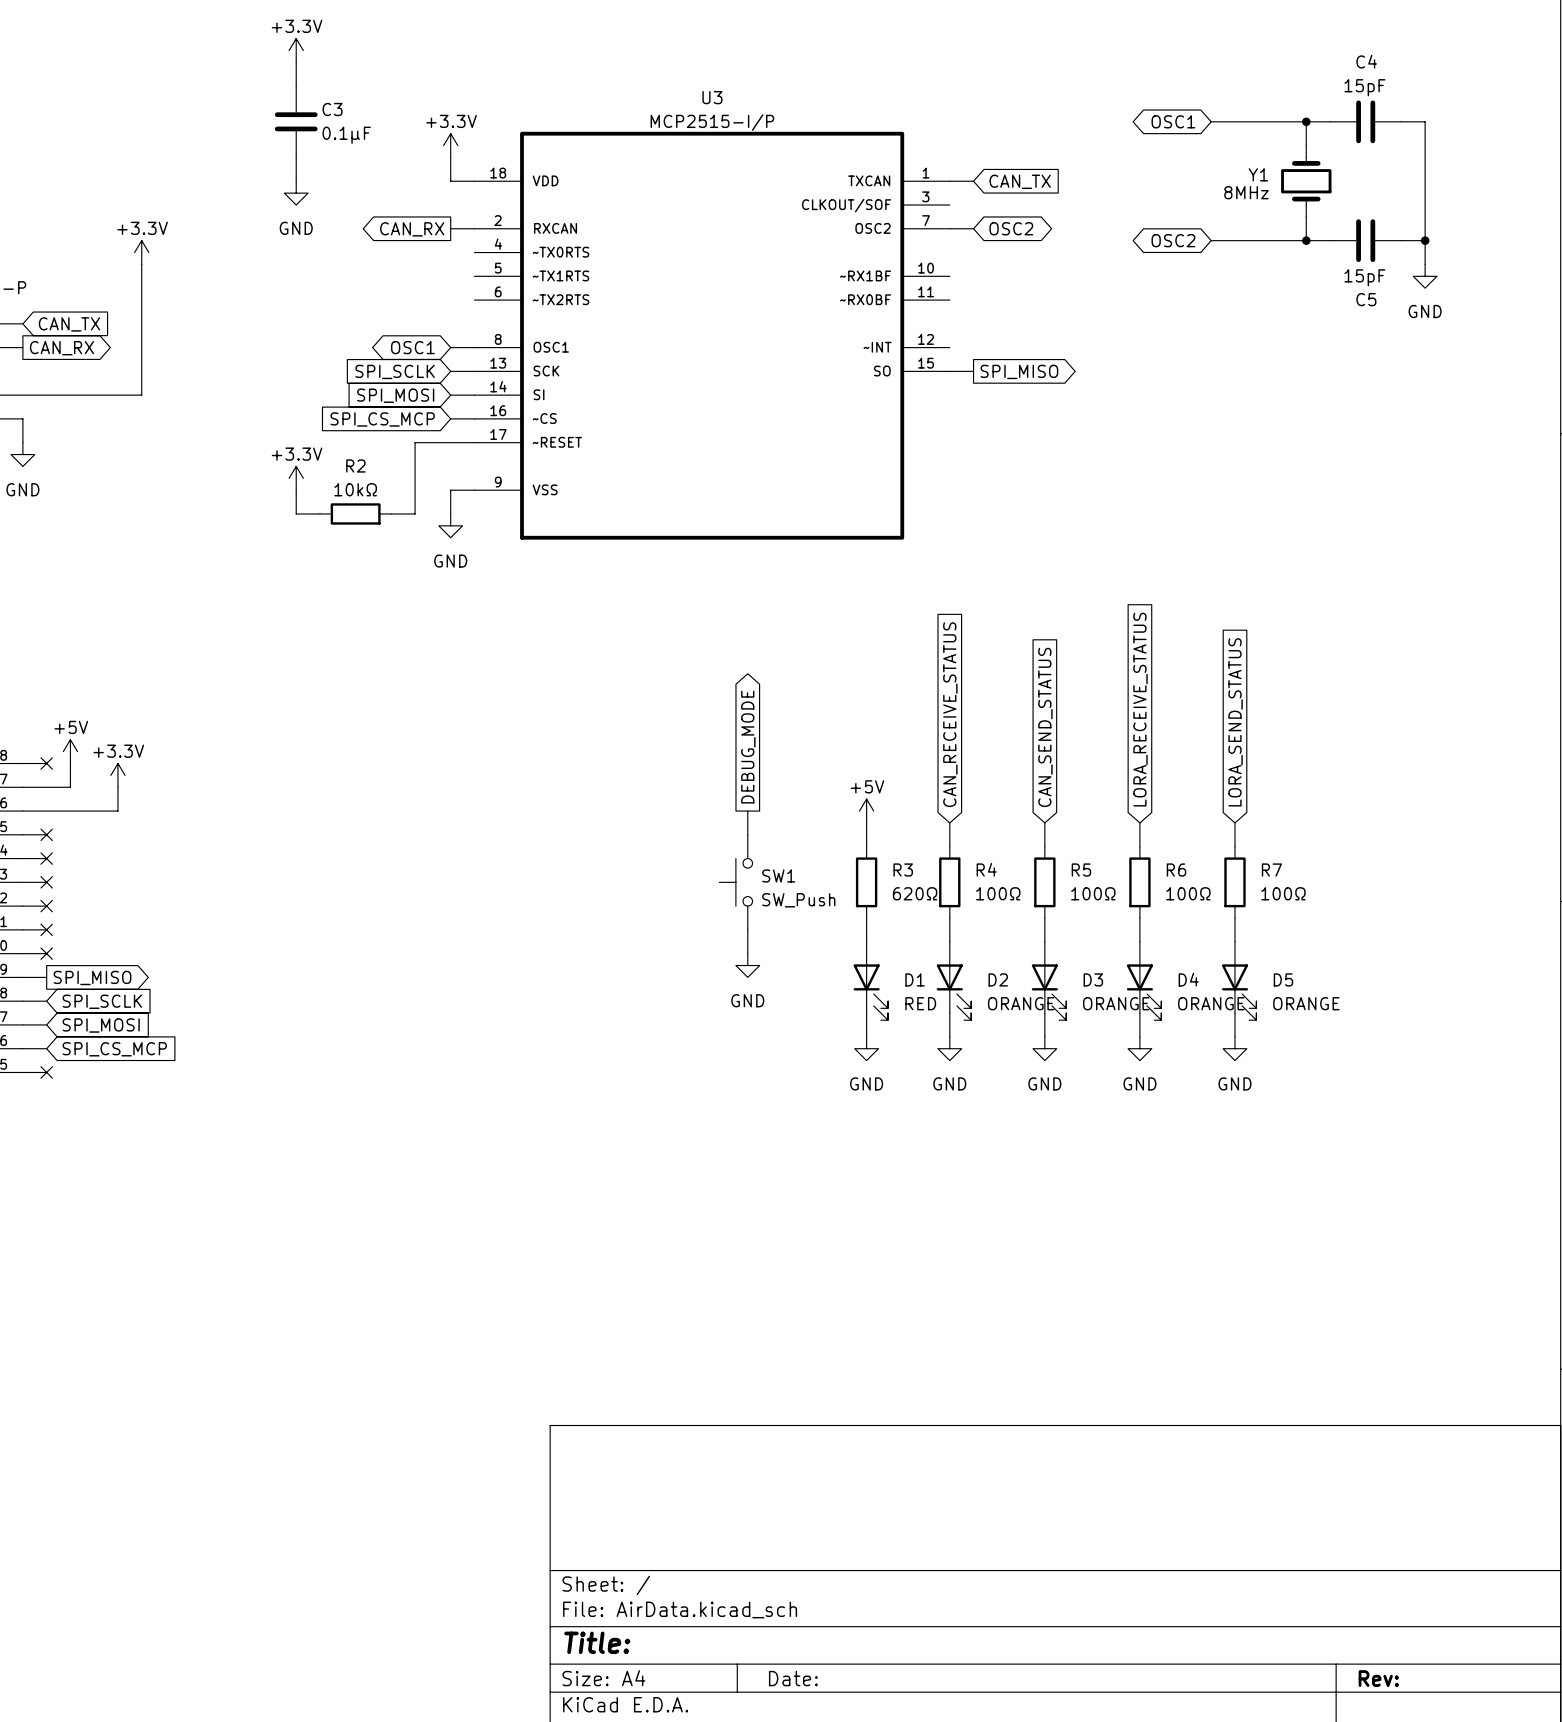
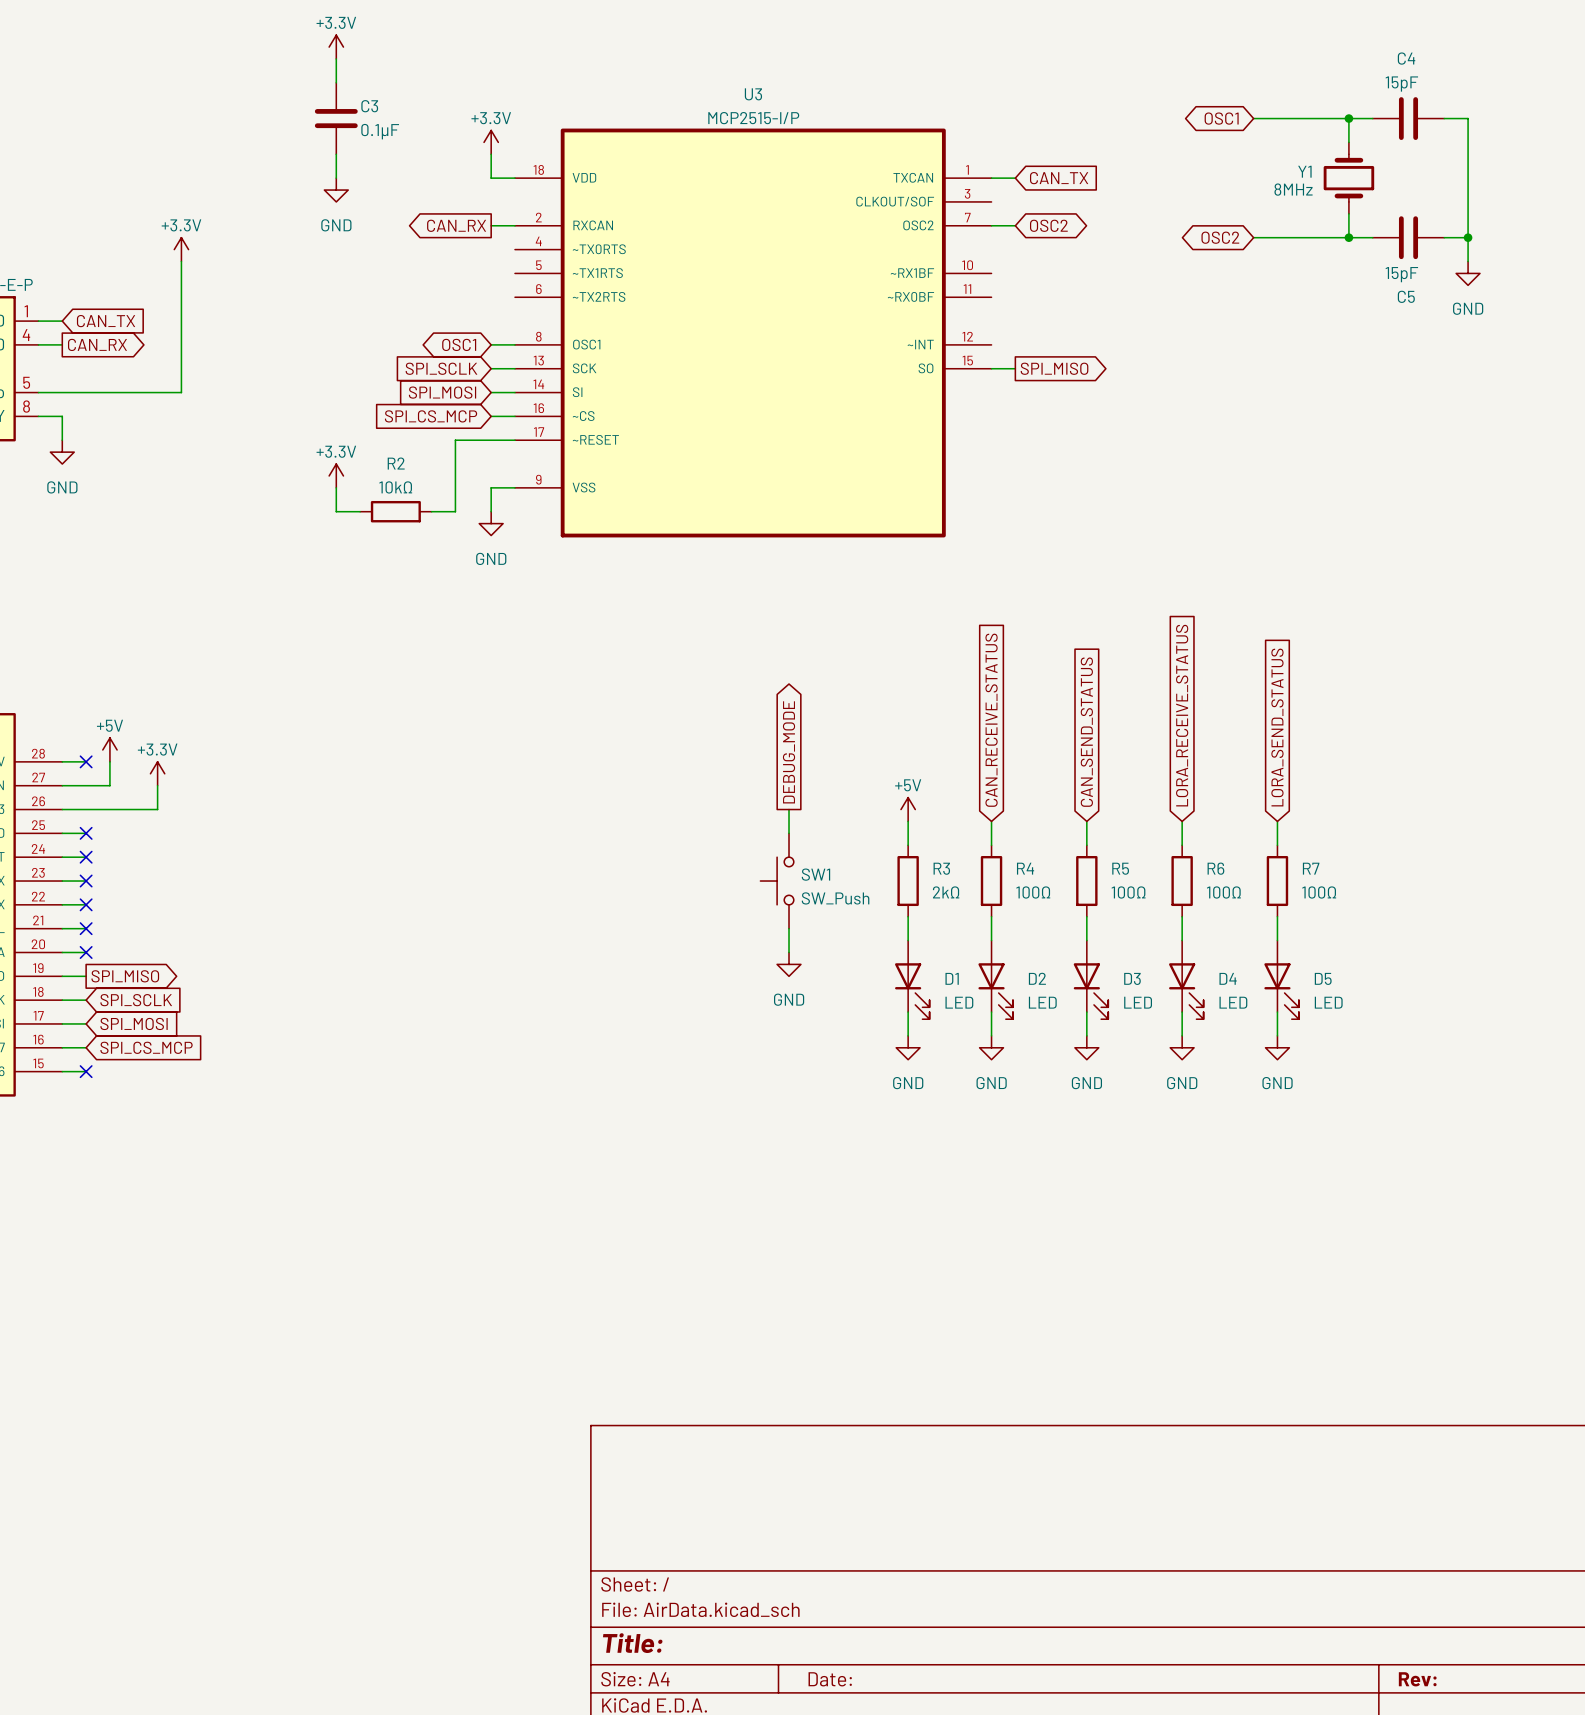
R3 value: 620Ω (915, 893) -> 2kΩ (946, 892)
D1 value: RED (920, 1003) -> LED (959, 1002)
D2 value: ORANGE (1021, 1003) -> LED (1042, 1002)
D3 value: ORANGE (1116, 1003) -> LED (1138, 1002)
D4 value: ORANGE (1211, 1003) -> LED (1233, 1002)
D5 value: ORANGE (1306, 1003) -> LED (1328, 1002)

